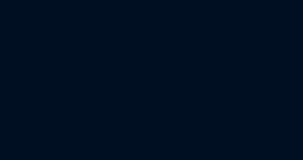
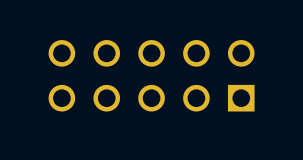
part: none -> (151, 75)

